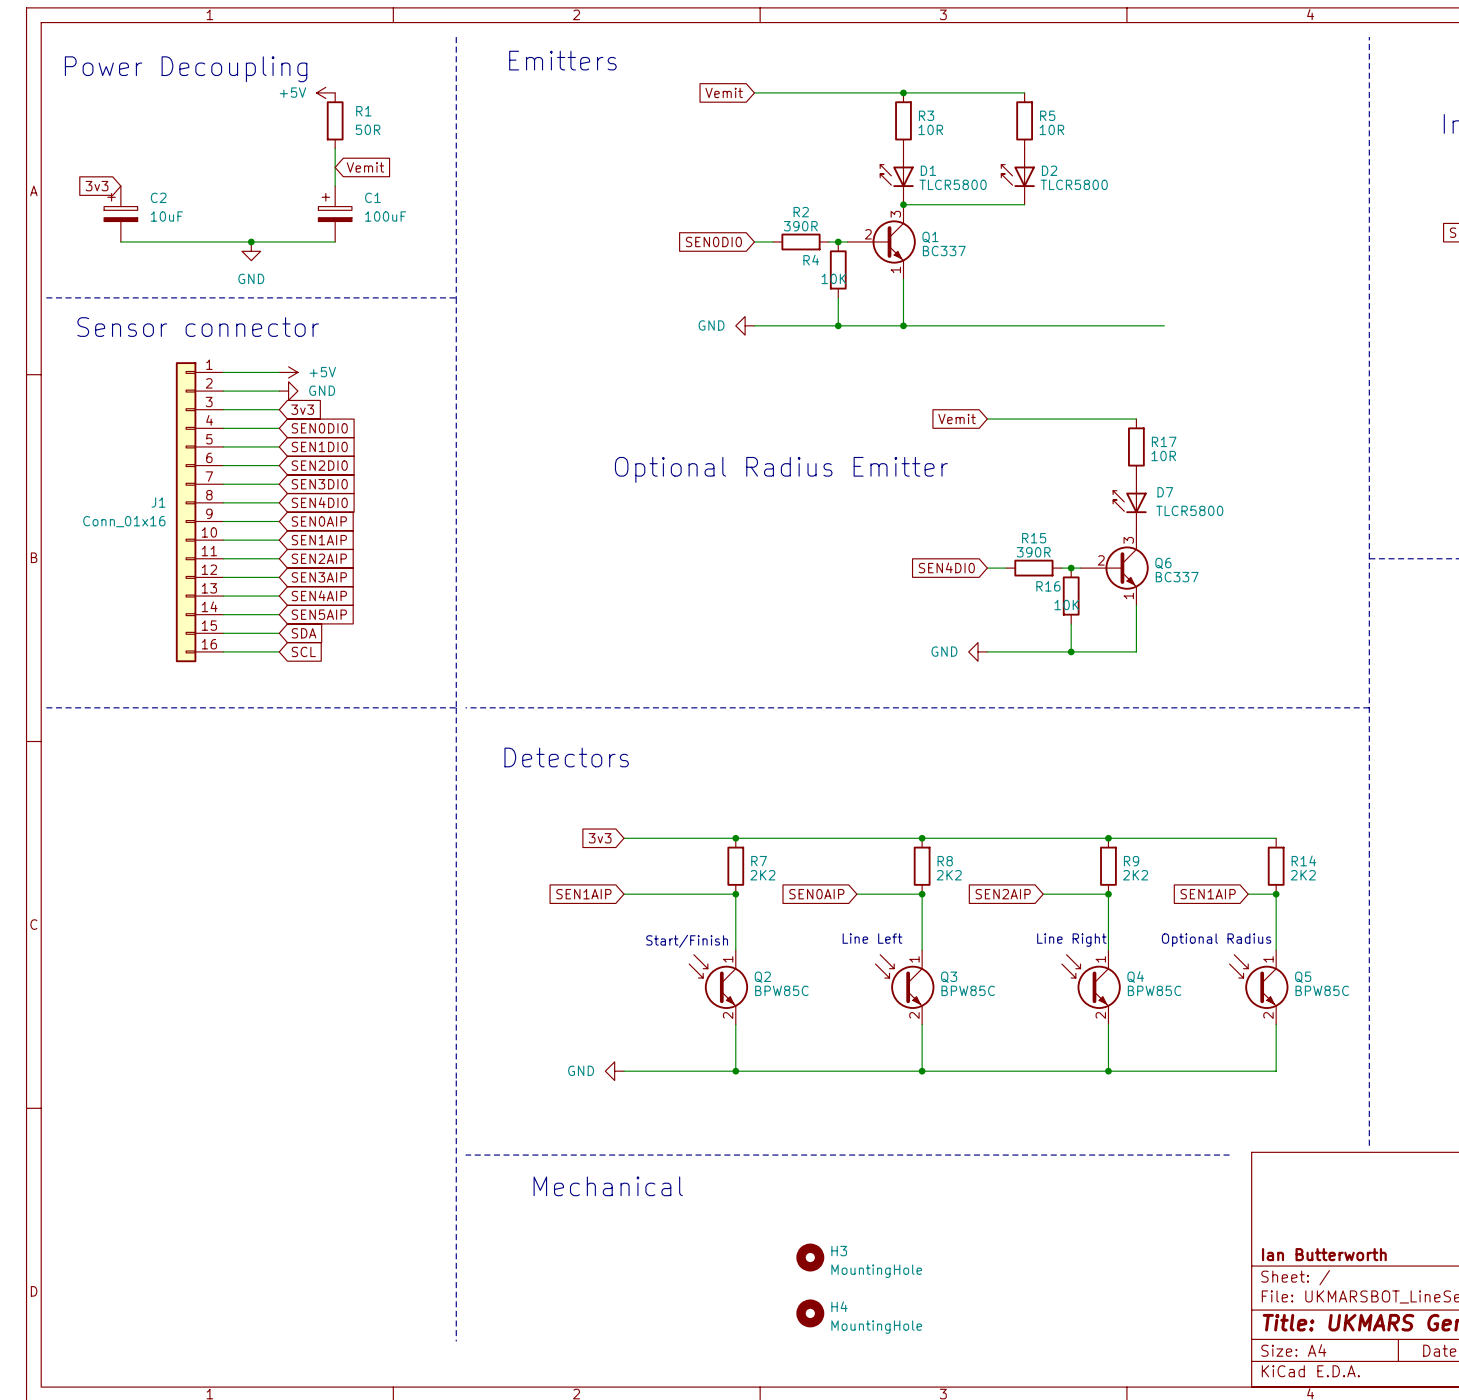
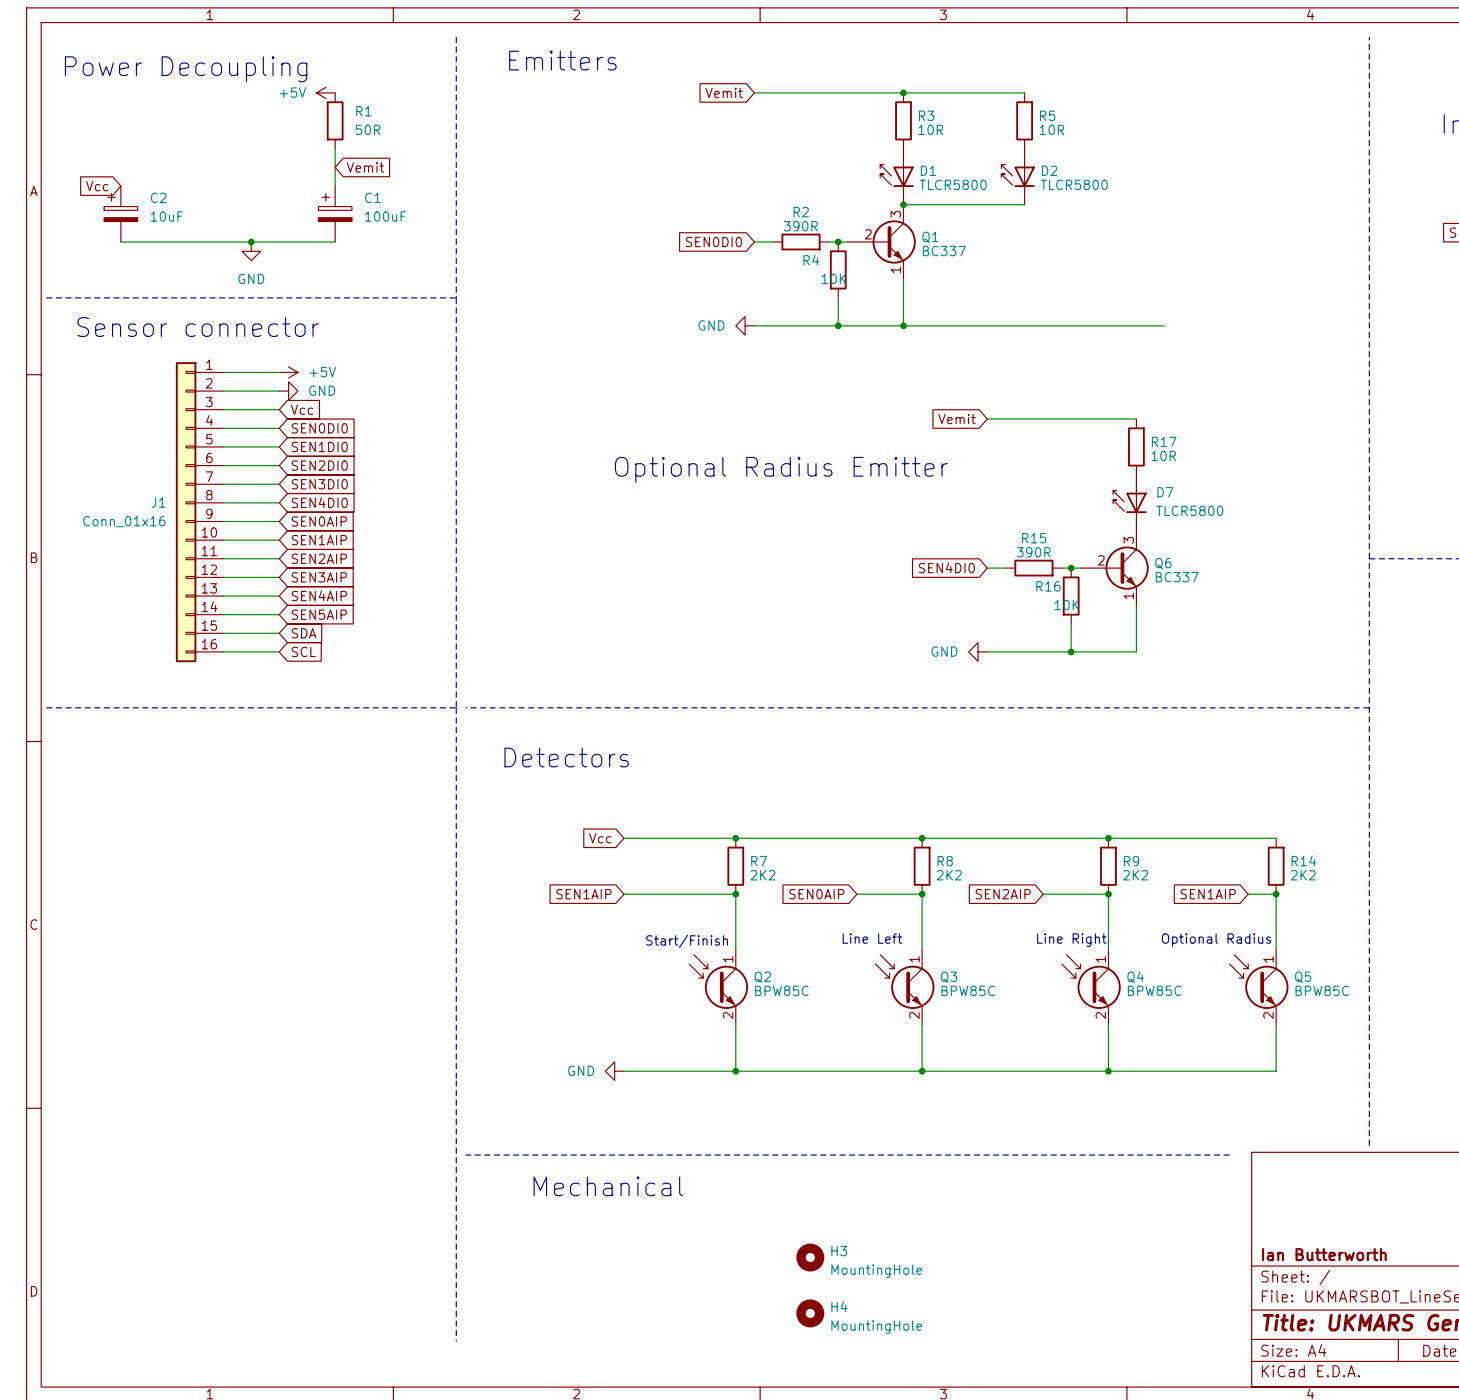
global label: 3v3 (97, 186) -> Vcc (97, 186)
global label: 3v3 (302, 409) -> Vcc (302, 409)
global label: 3v3 (600, 838) -> Vcc (600, 838)

